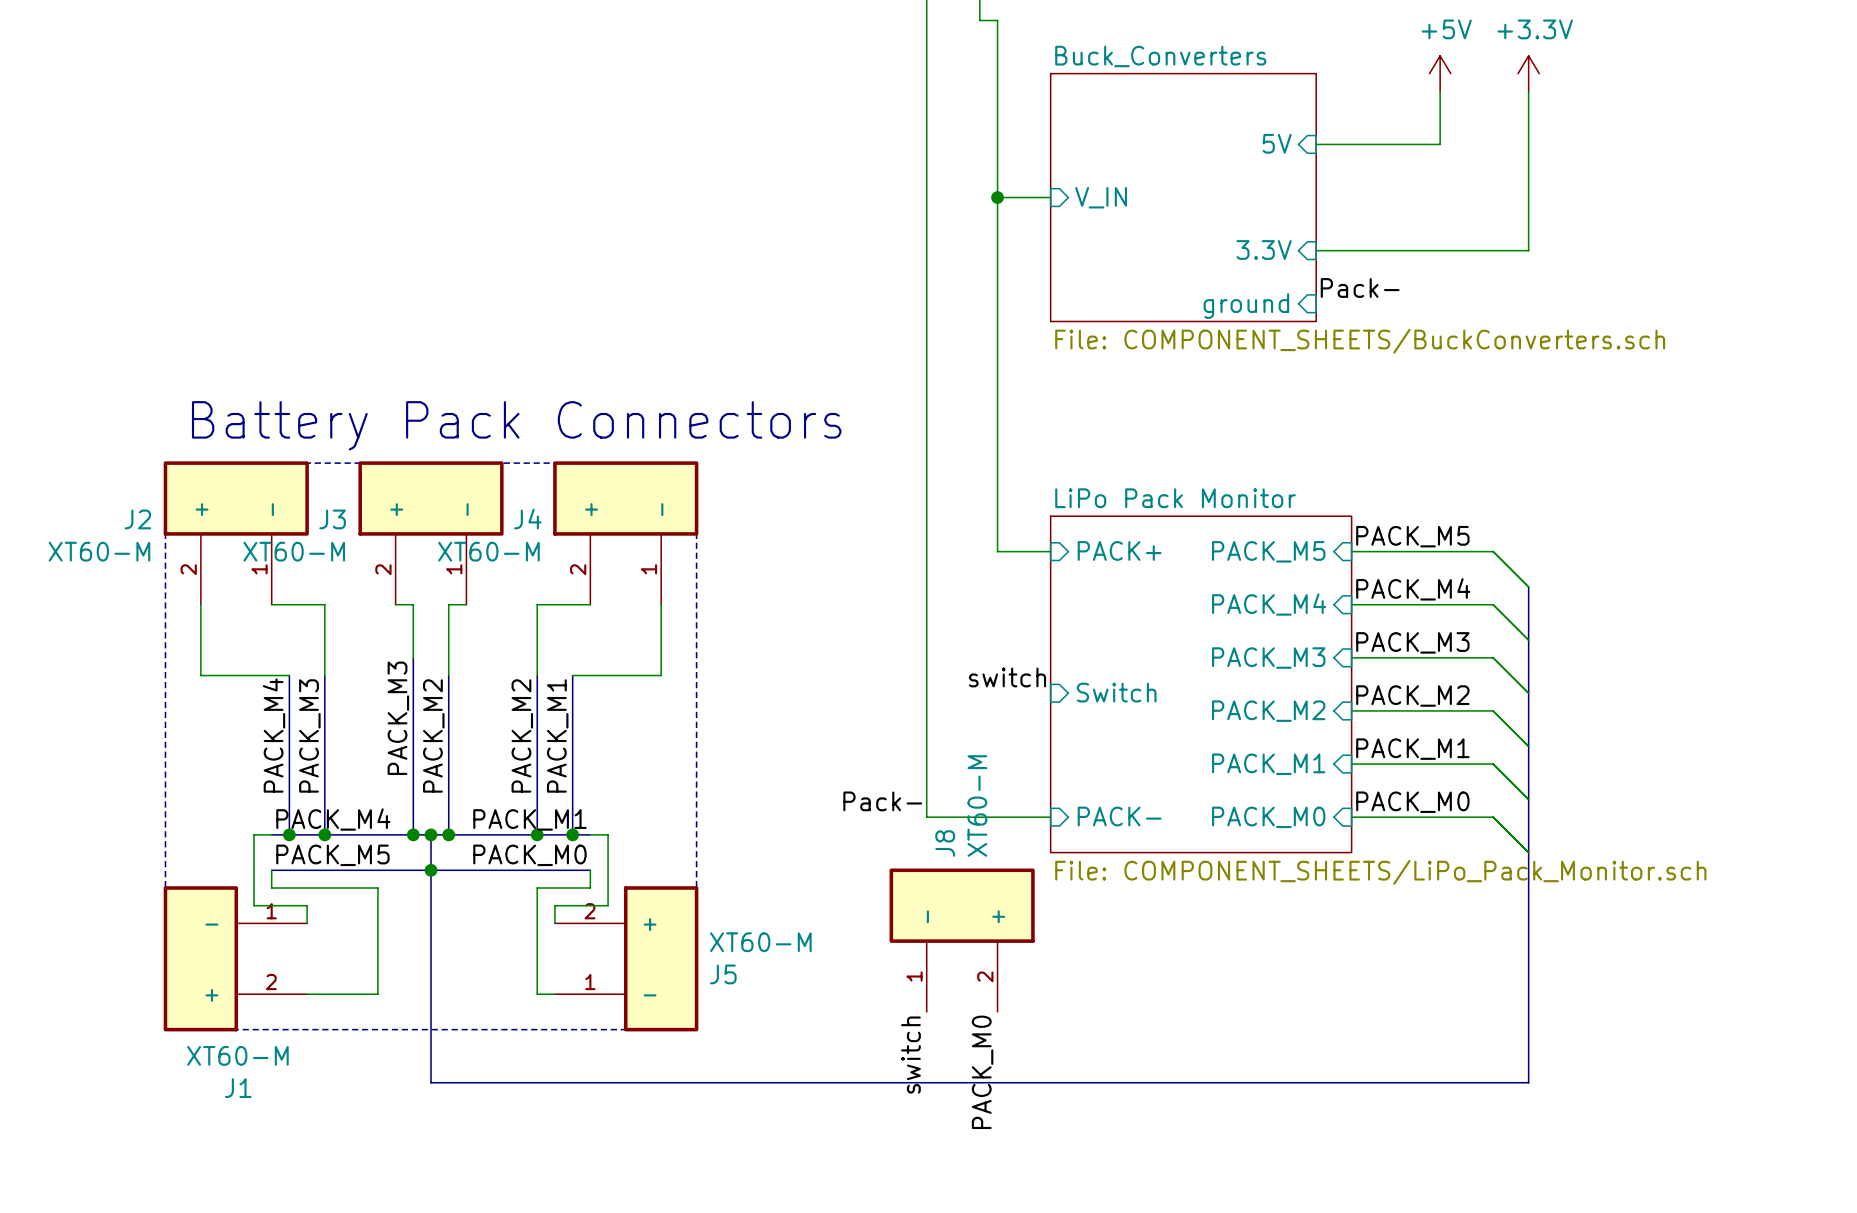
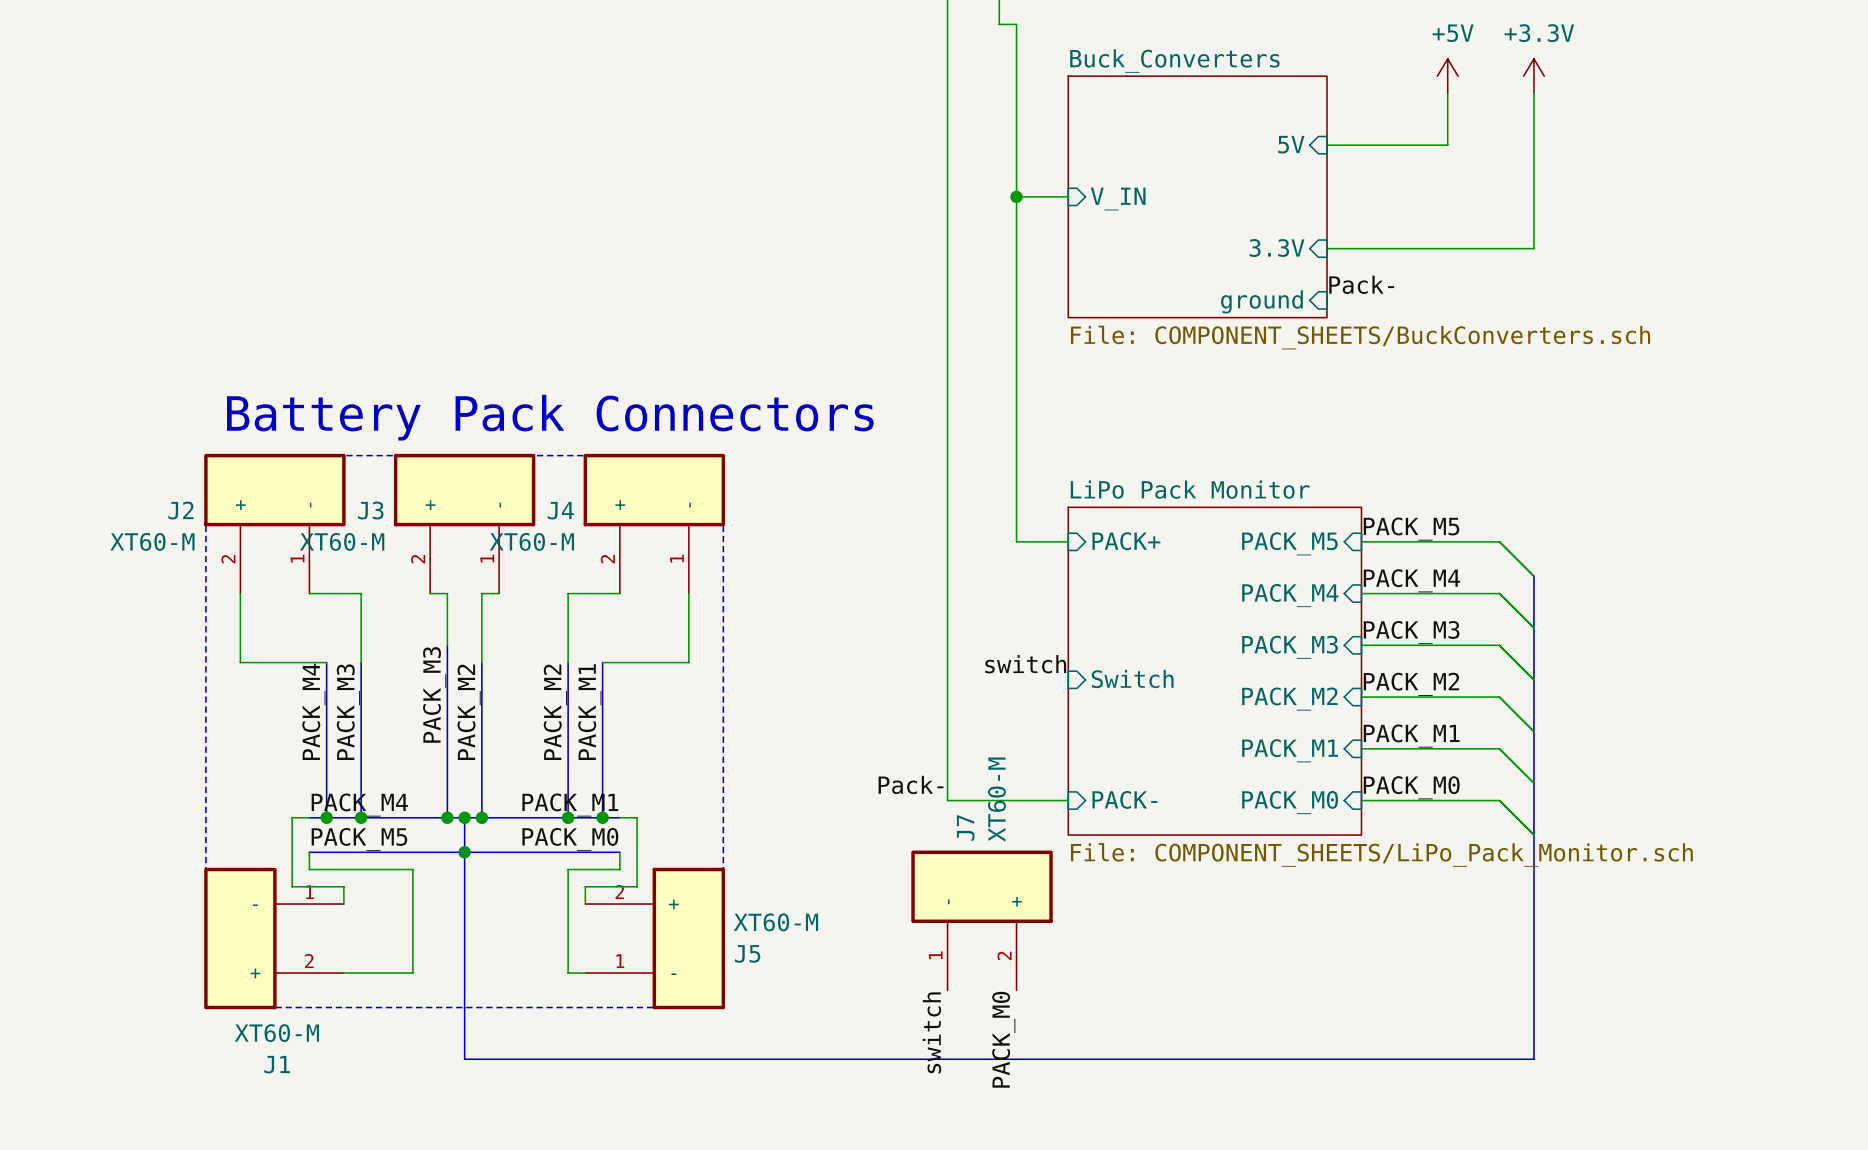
J8 name: J8 (945, 843) -> J7 (965, 827)

